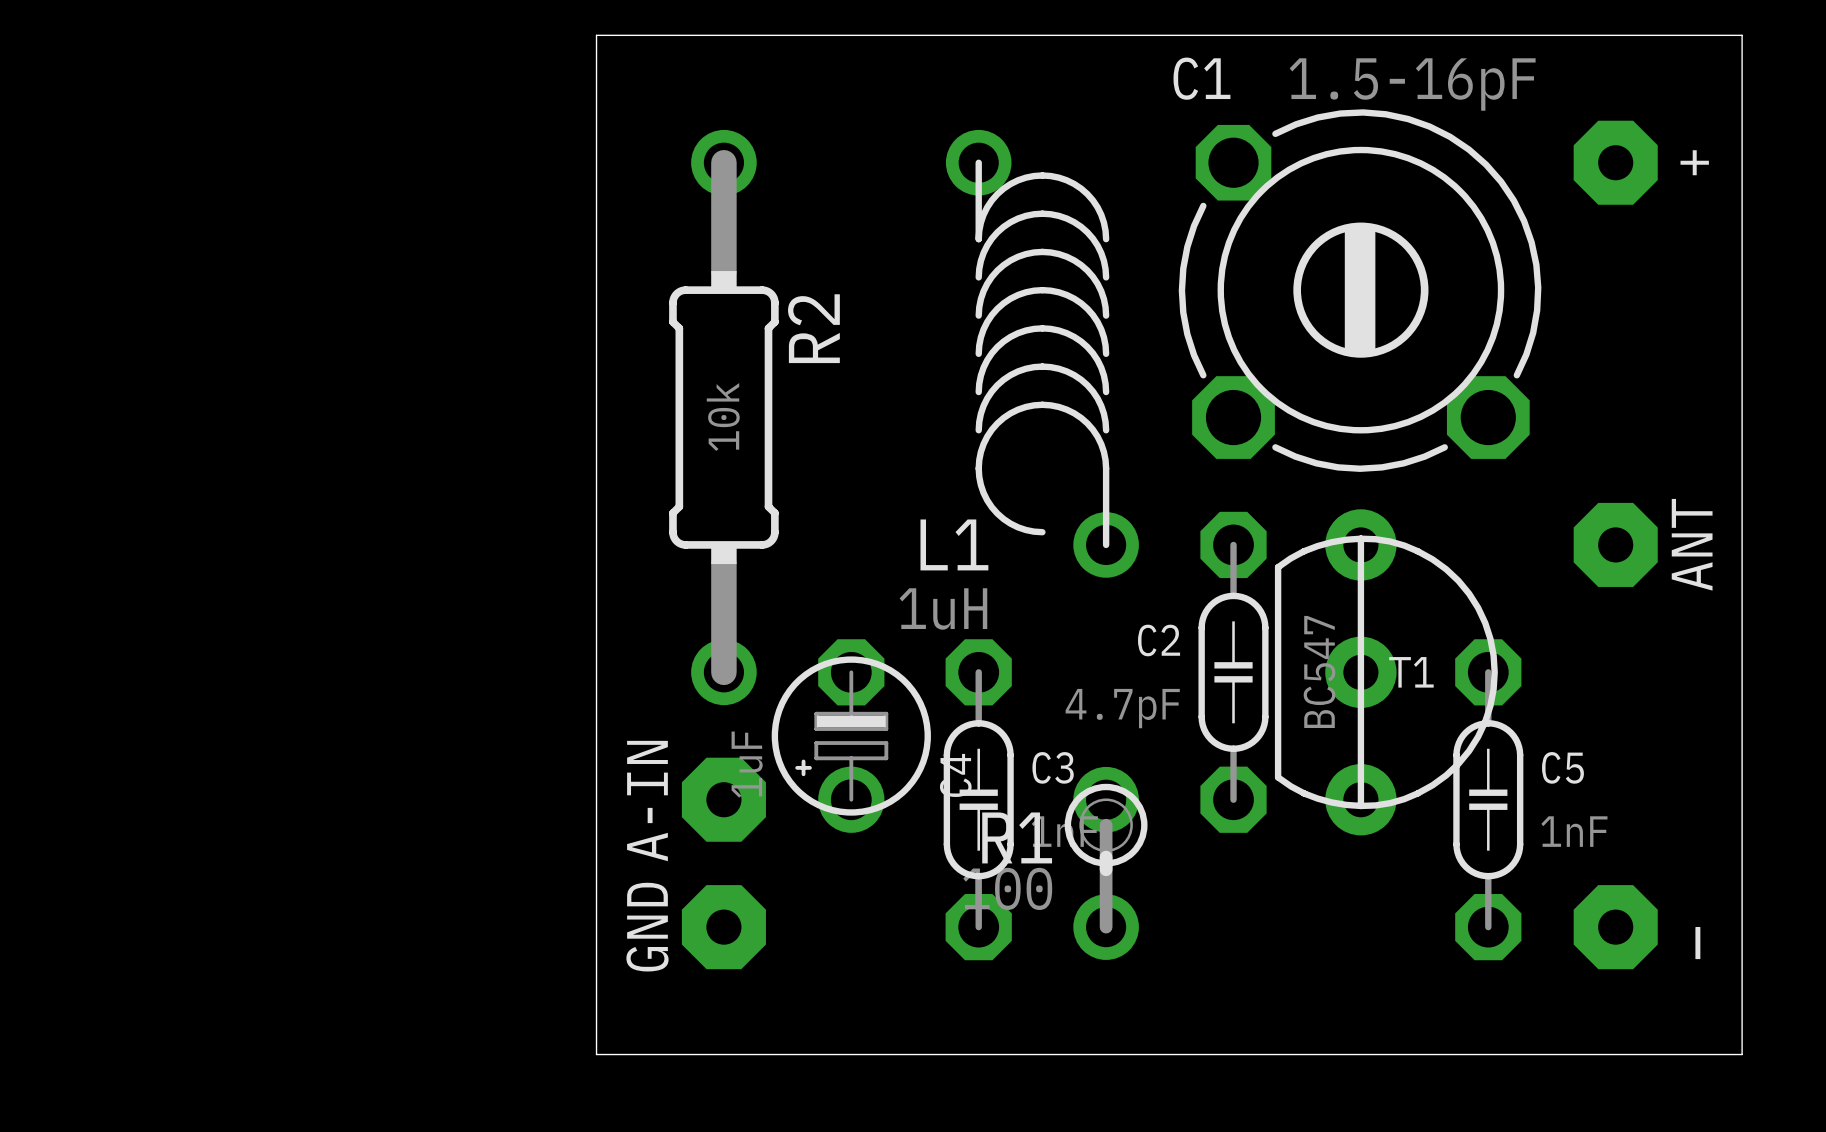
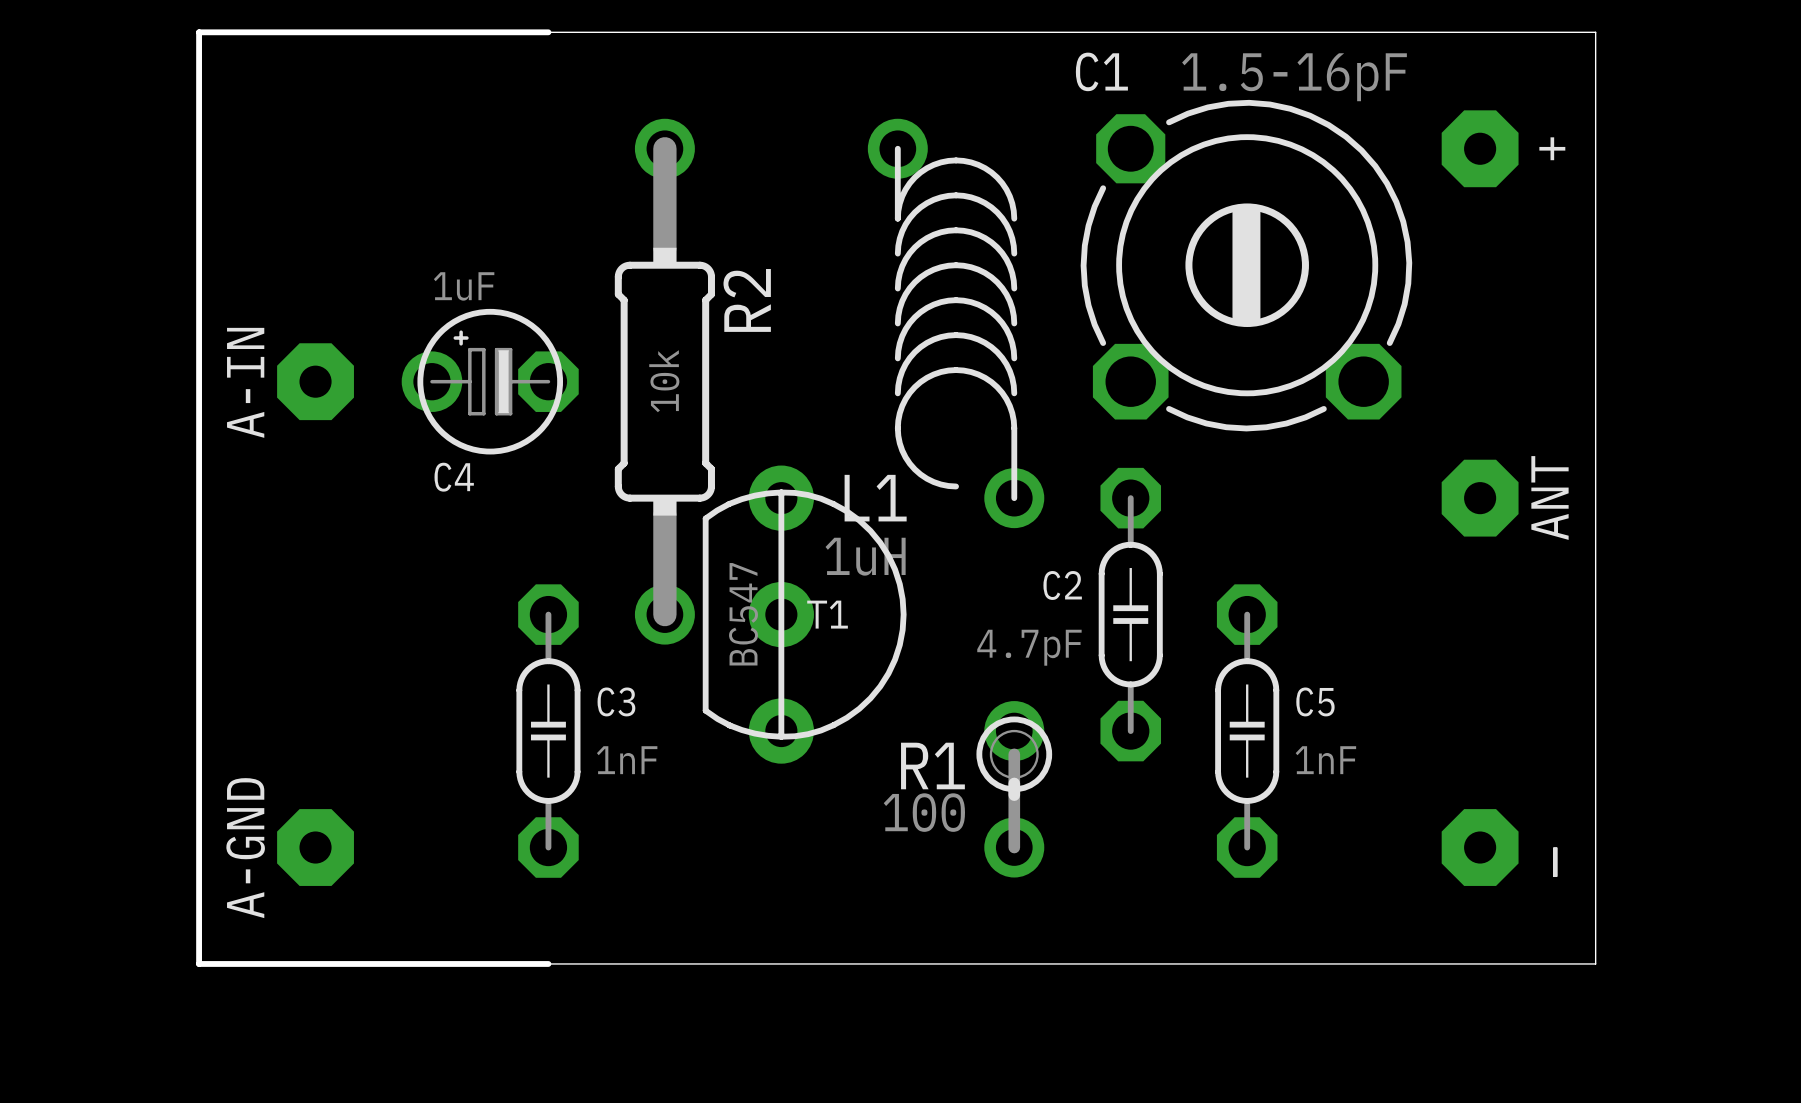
board edge: (596, 35) (596, 1054) -> (548, 32) (199, 32) (199, 963) (548, 963)
T1 position: (1386, 672) -> (804, 614)
C4 rotation: 0° (851, 736) -> 90° clockwise (490, 381)
C4 position: (851, 736) -> (490, 381)
A-IN position: (723, 799) -> (315, 381)
C3 position: (978, 799) -> (548, 731)
C5 position: (1488, 799) -> (1247, 731)
A-GND: none -> (315, 847)
GND: (723, 927) -> none

